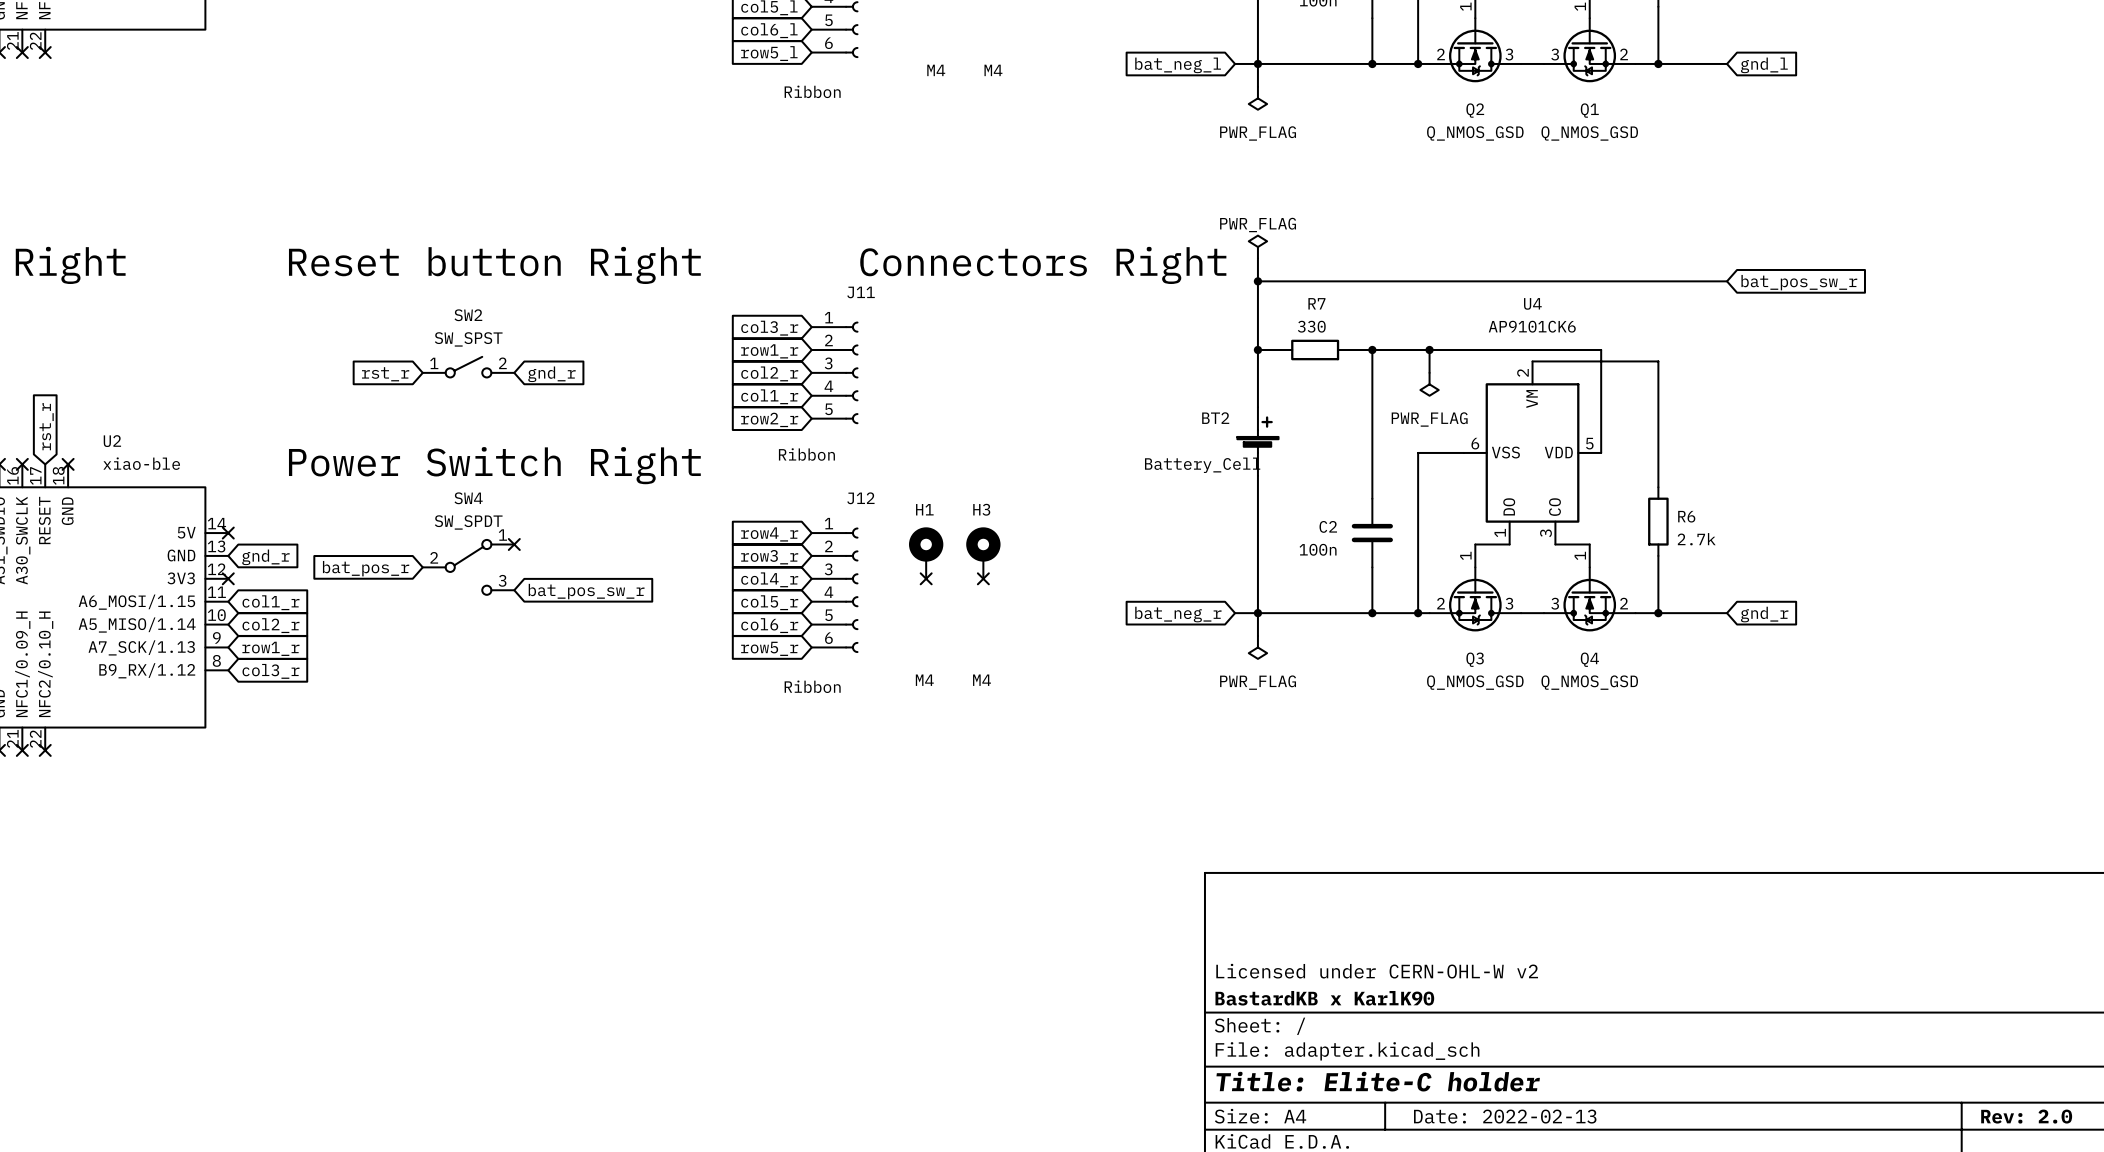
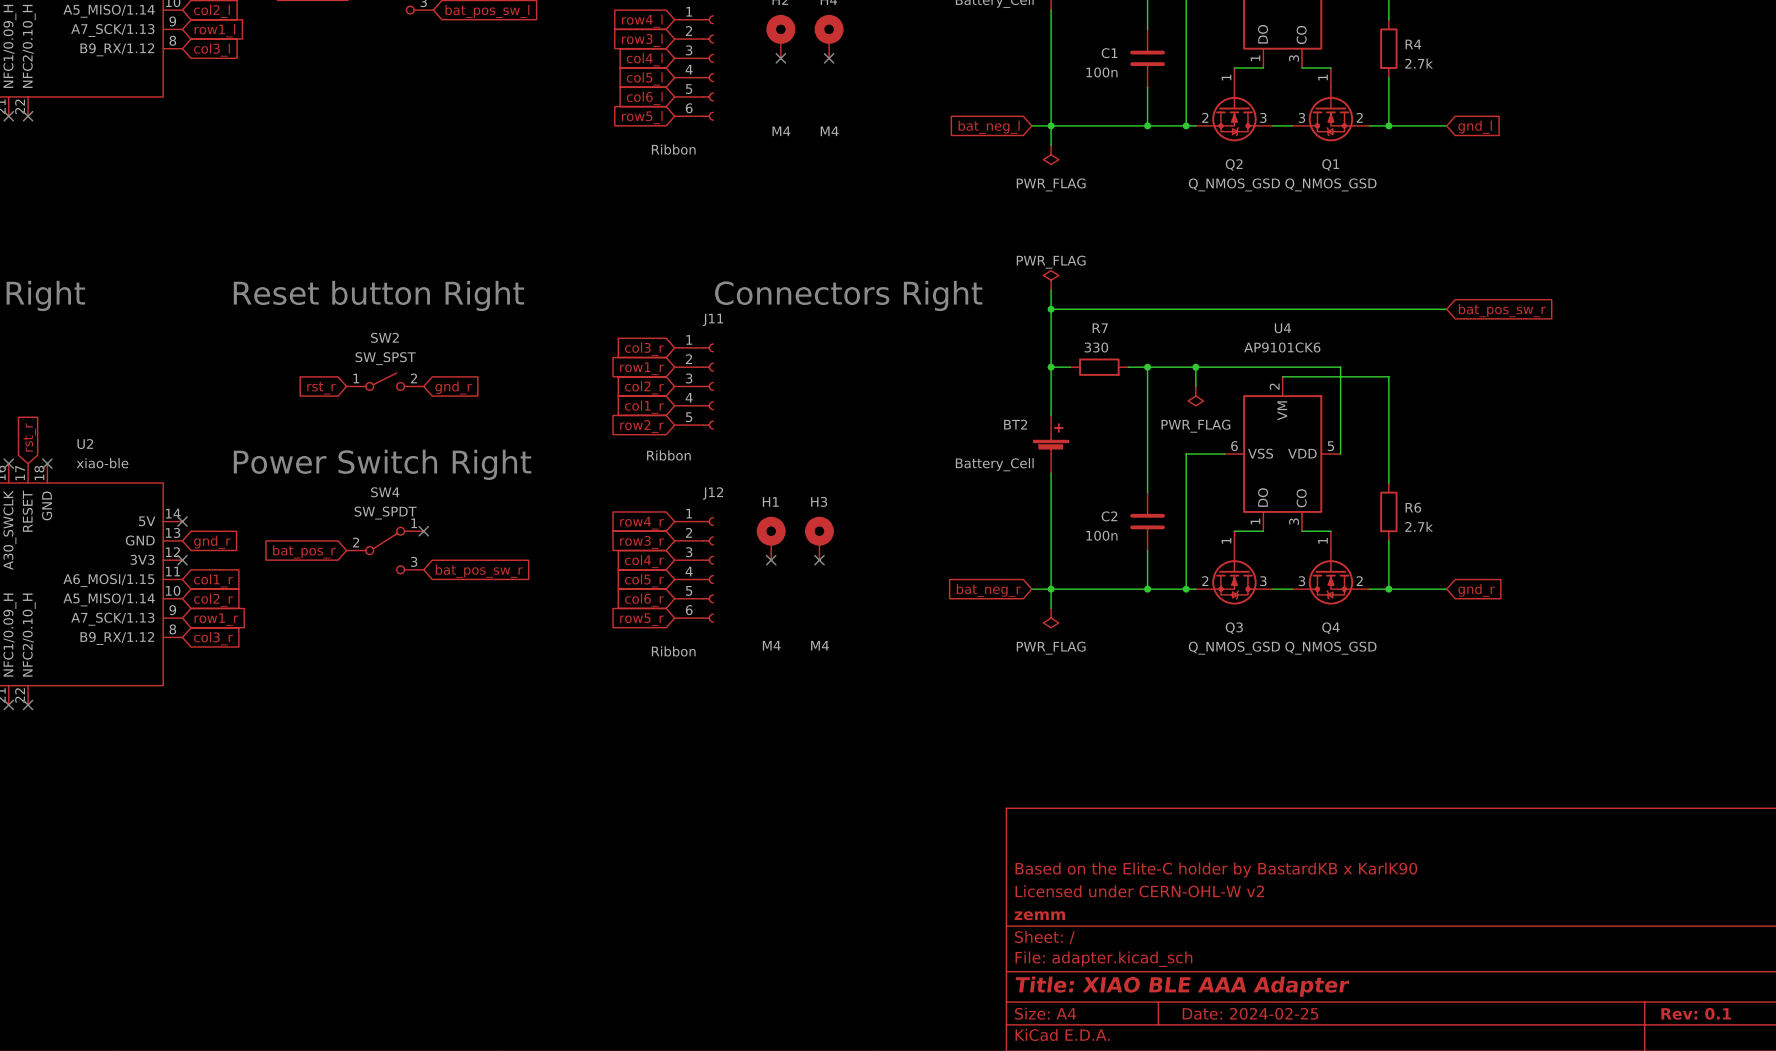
title block: none -> Based on the Elite-C holder by BastardKB x KarlK90 (1216, 870)
title block: BastardKB x KarlK90 (1324, 998) -> zemm (1039, 915)
title block: Title: Elite-C holder (1378, 1081) -> Title: XIAO BLE AAA Adapter (1182, 986)
title block: Date: 2022-02-13 (1505, 1116) -> Date: 2024-02-25 (1250, 1013)
title block: Rev: 2.0 (2026, 1116) -> Rev: 0.1 (1696, 1013)

